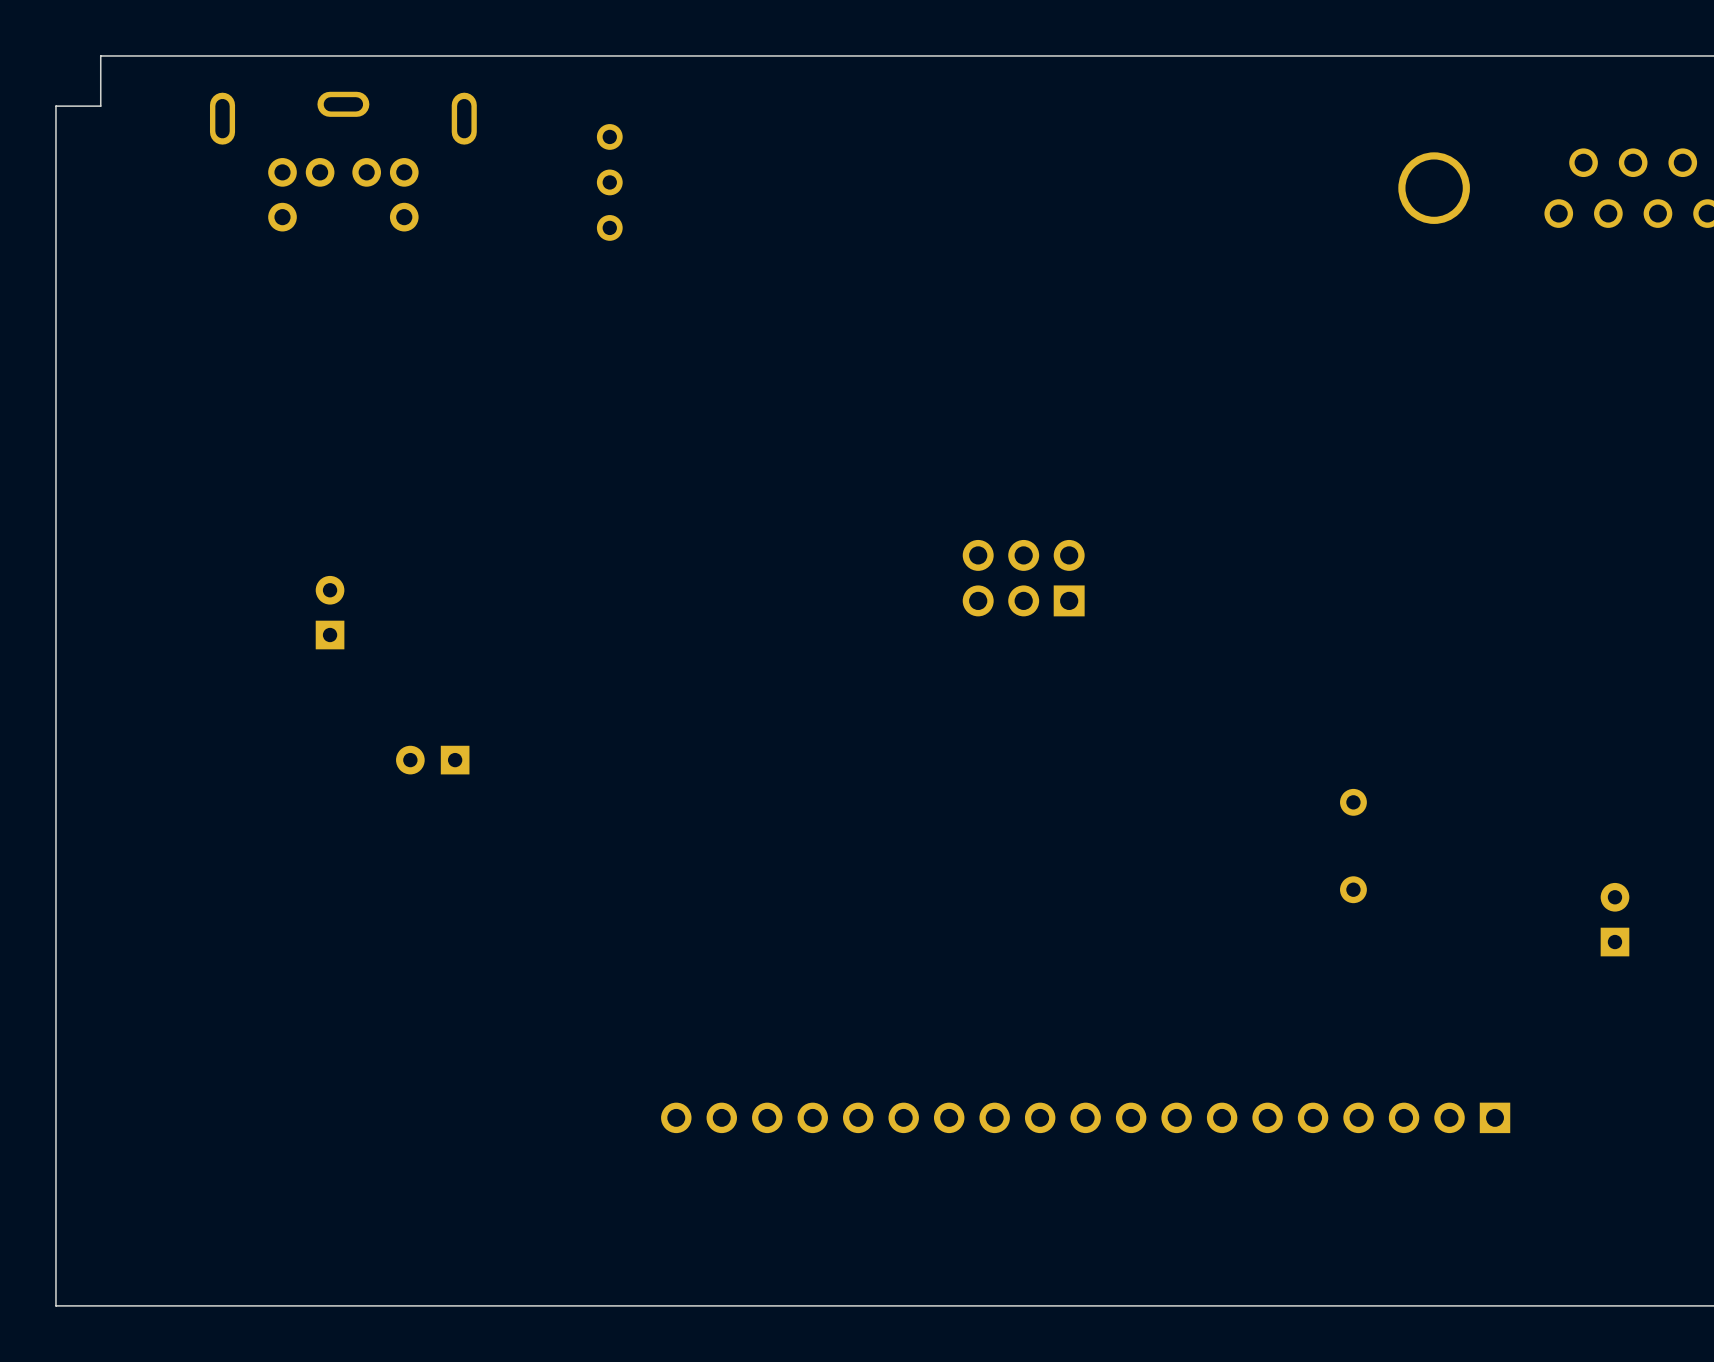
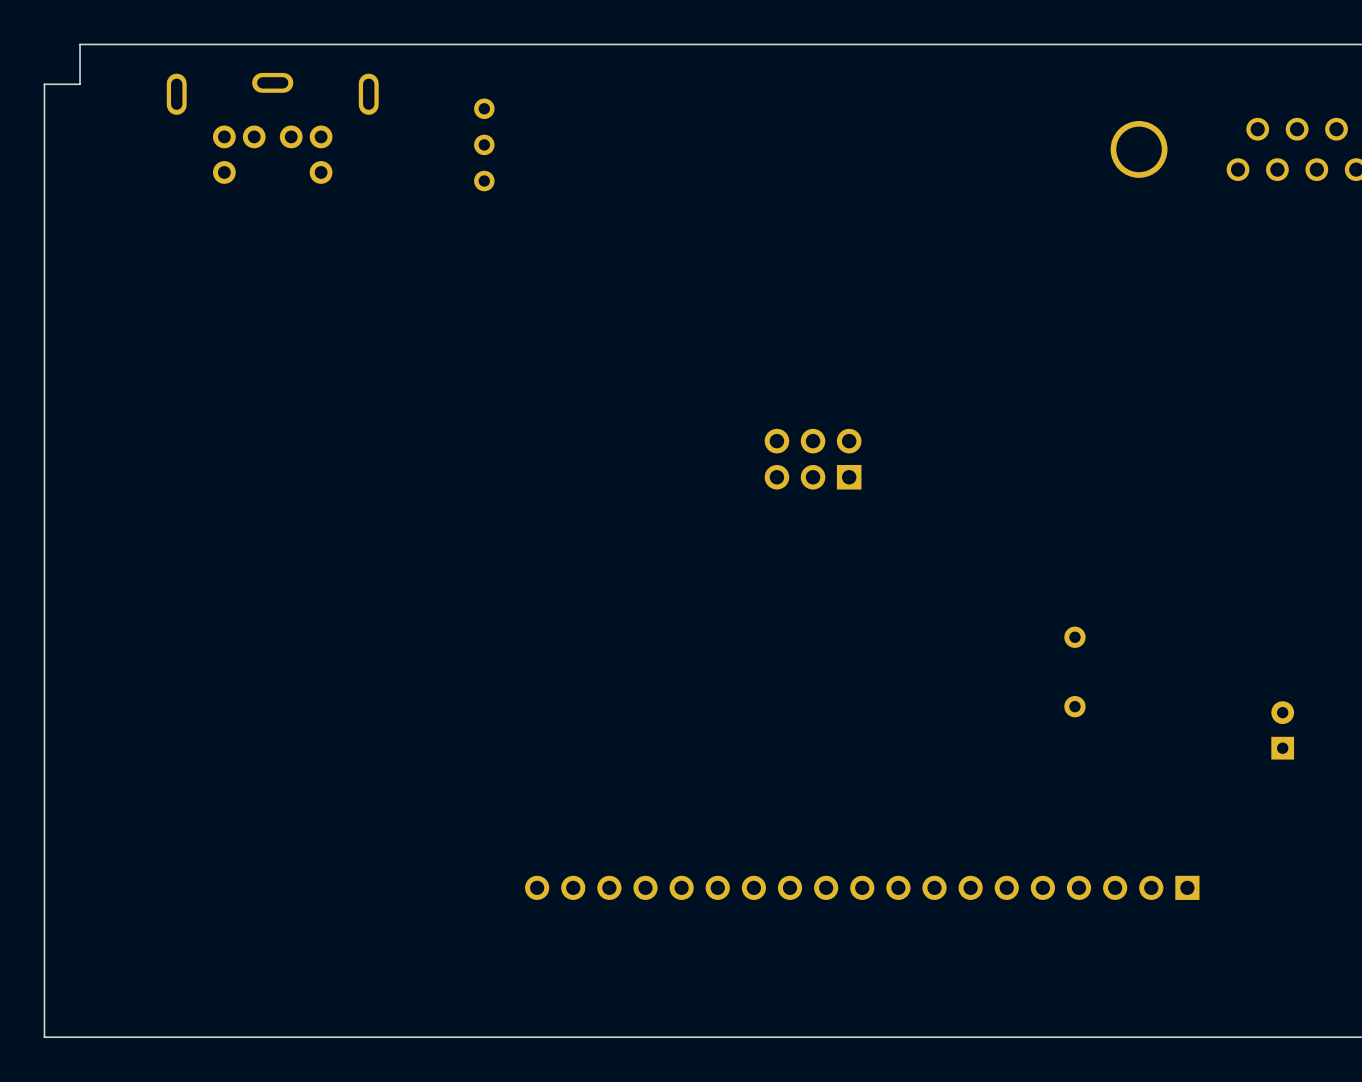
part: (330, 612) -> none
part: (432, 760) -> none

